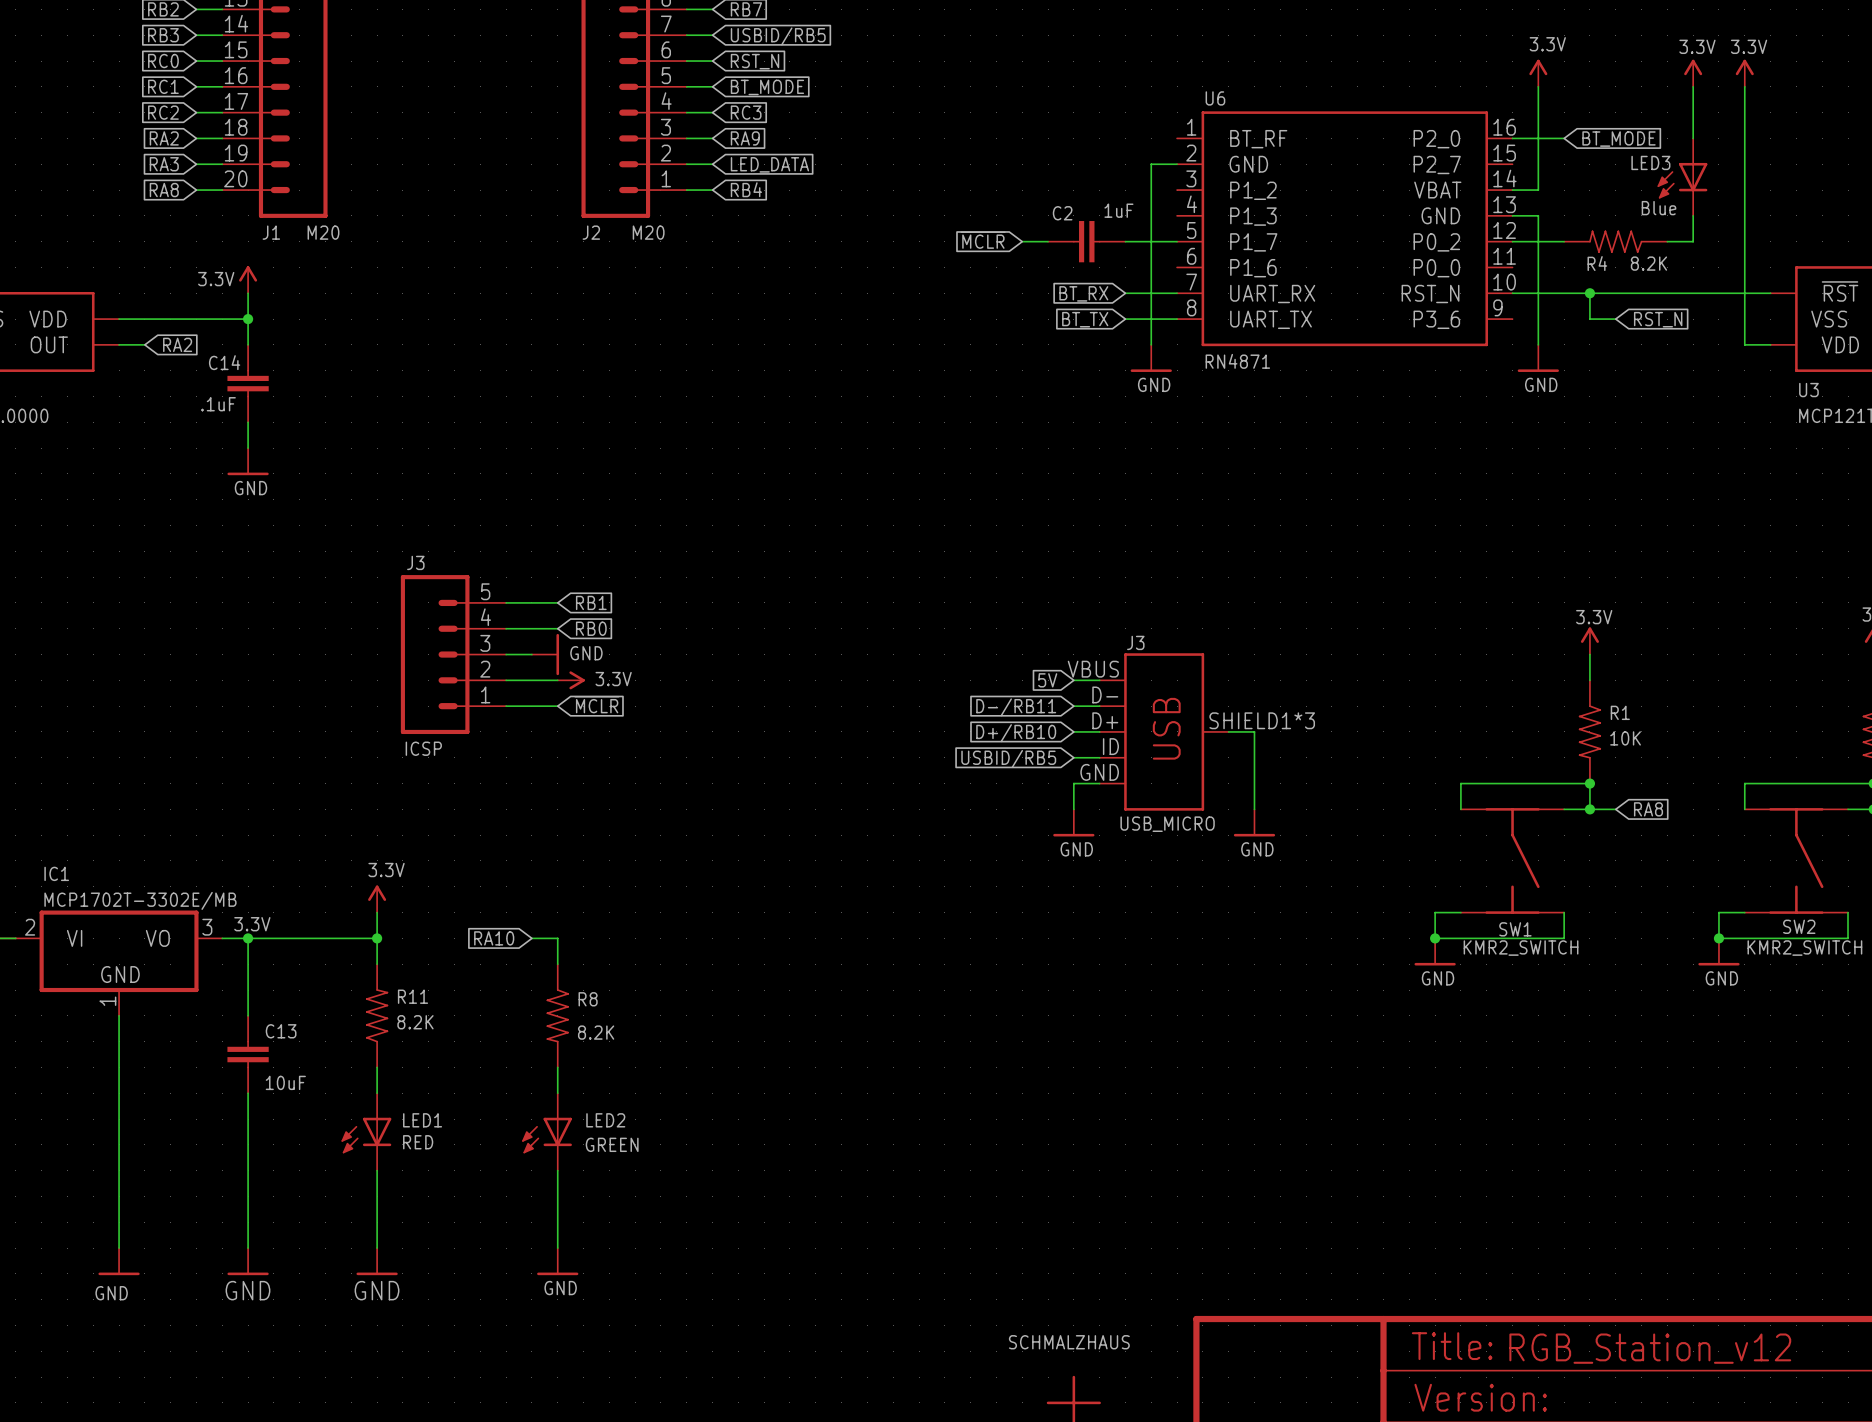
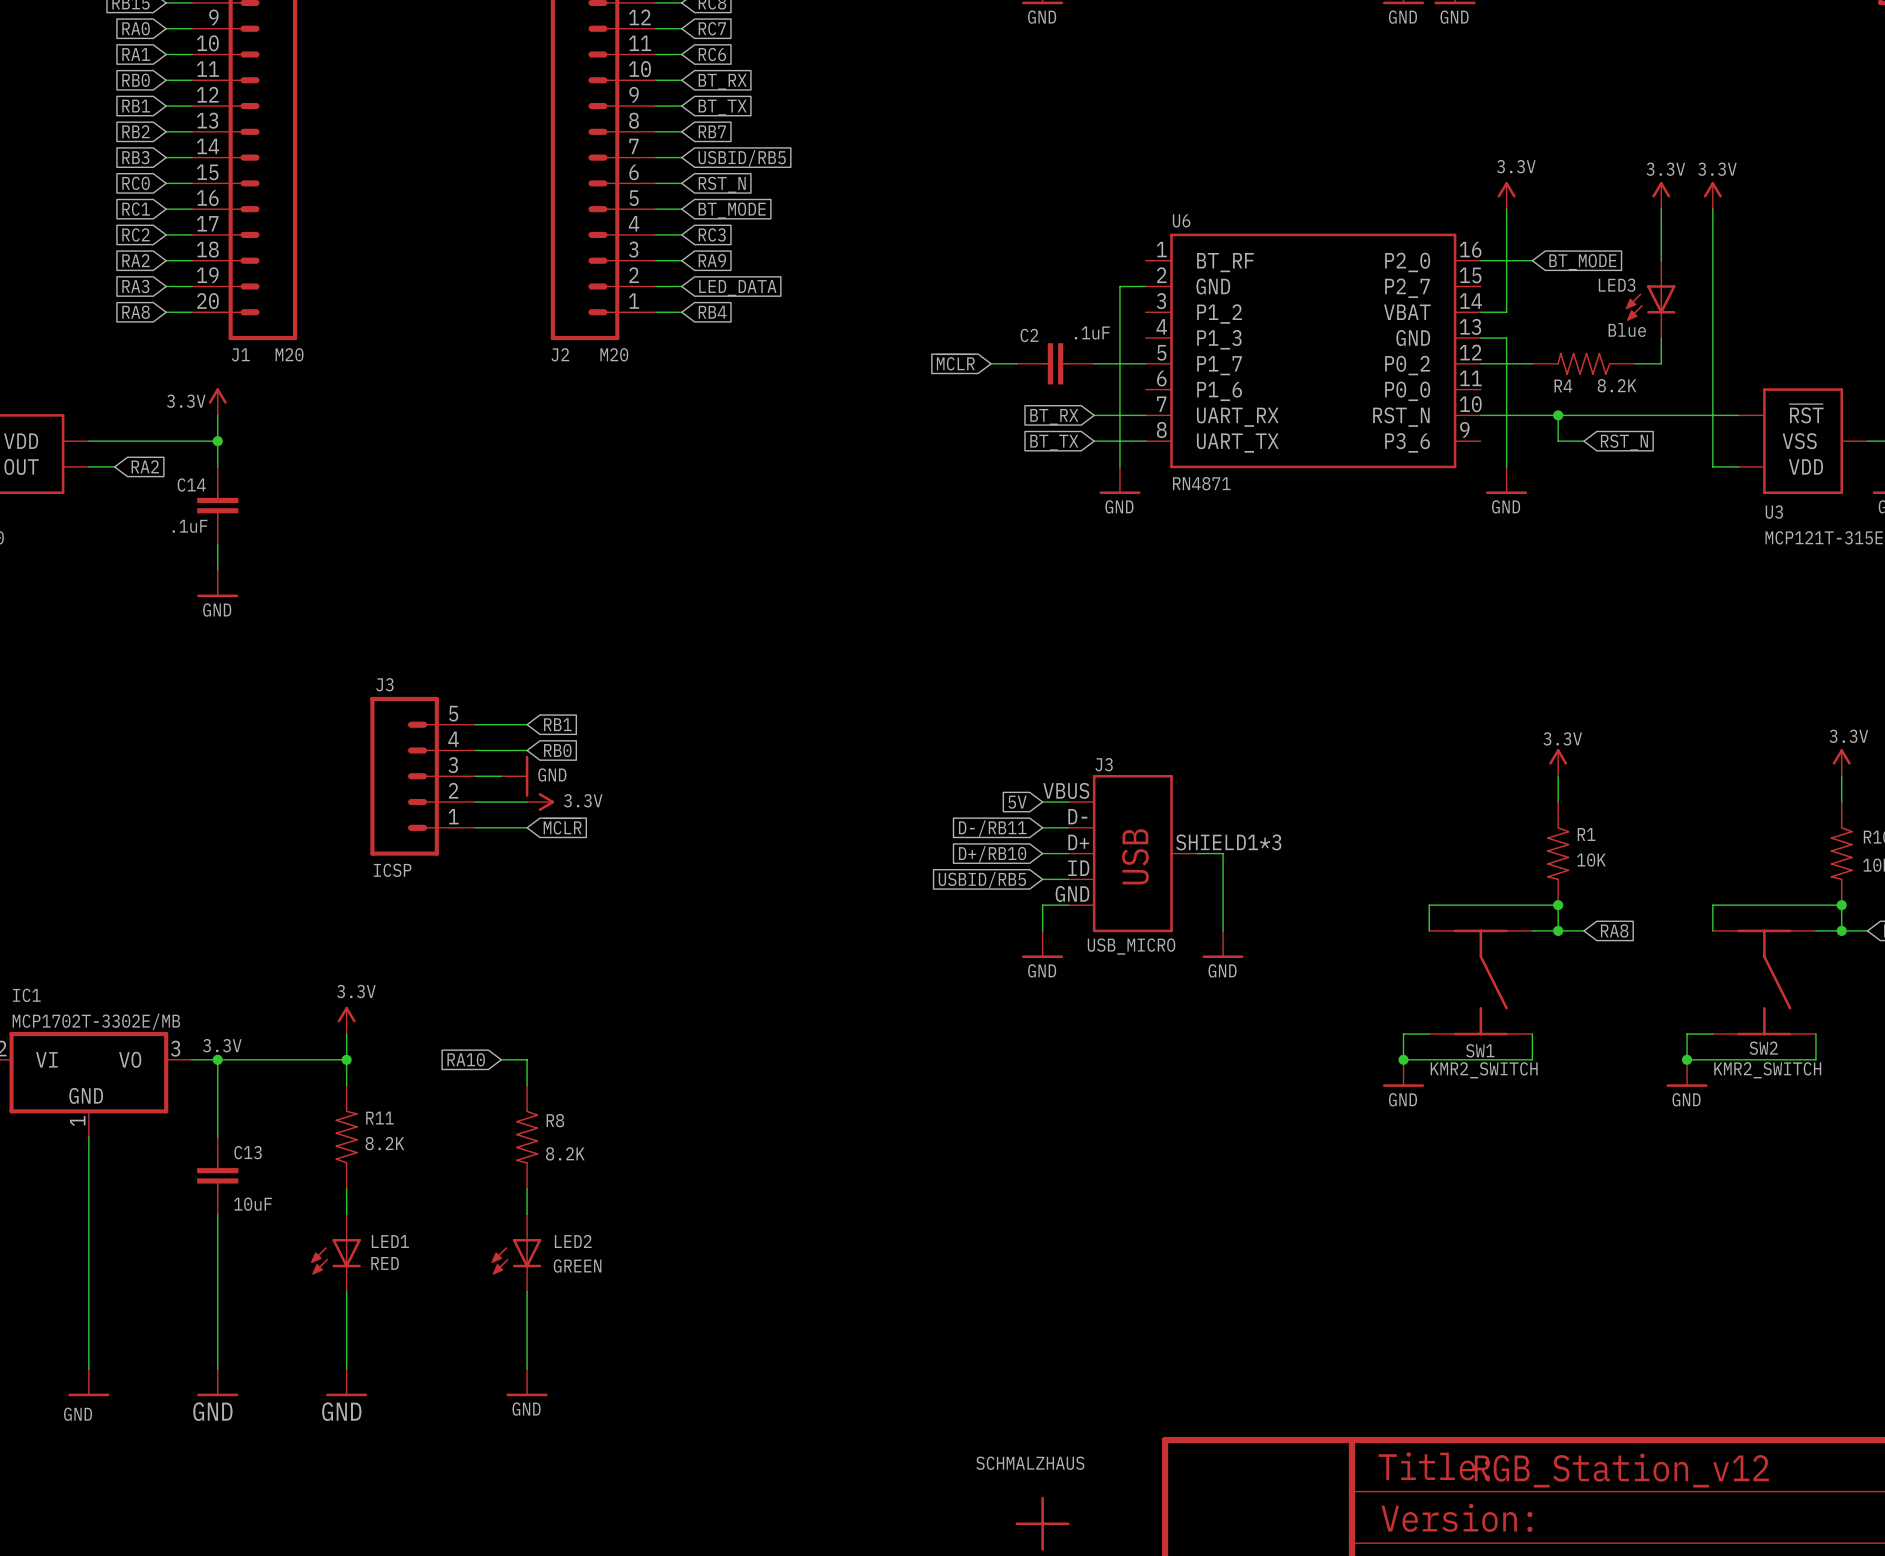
C2 value: 1uF (1118, 210) -> .1uF (1092, 333)

